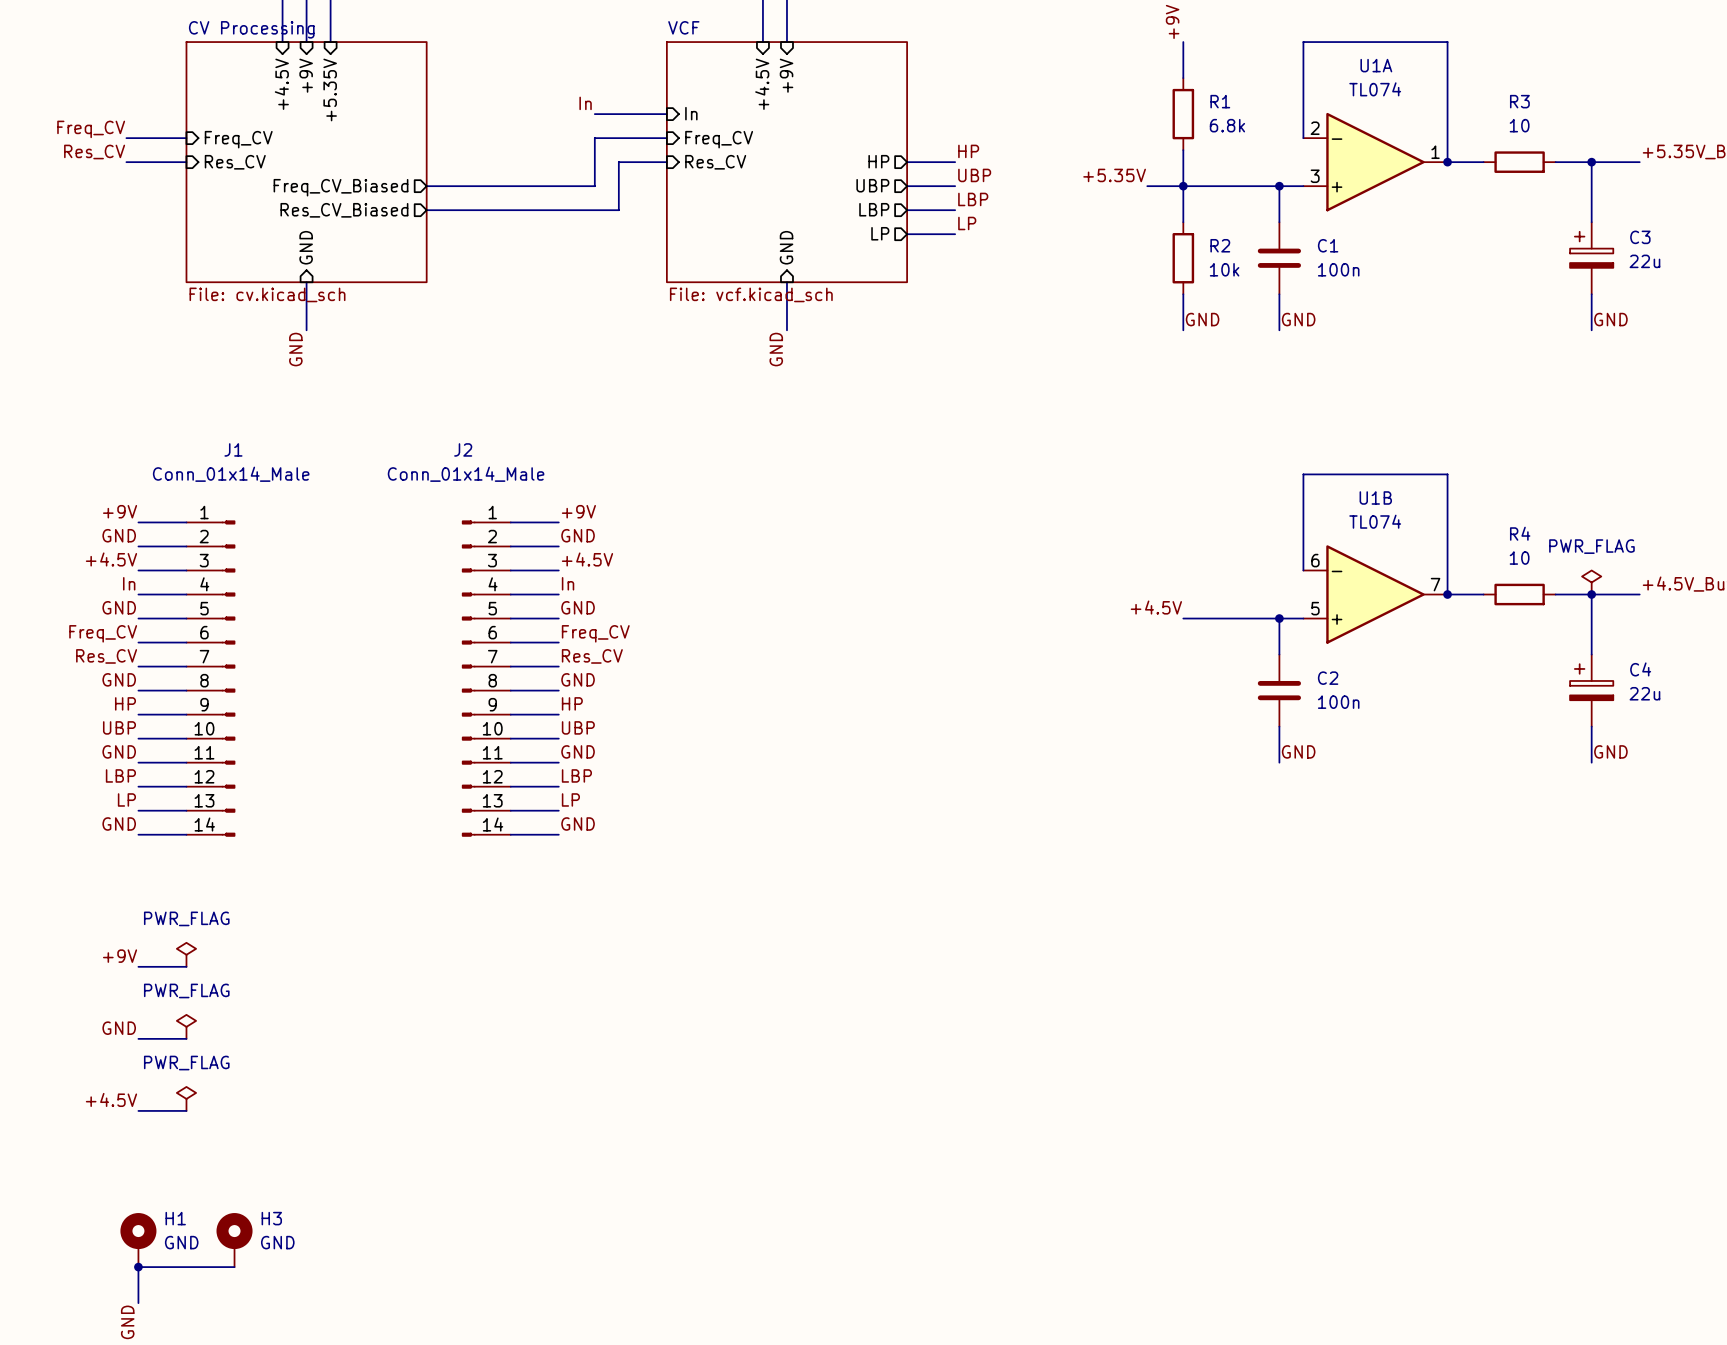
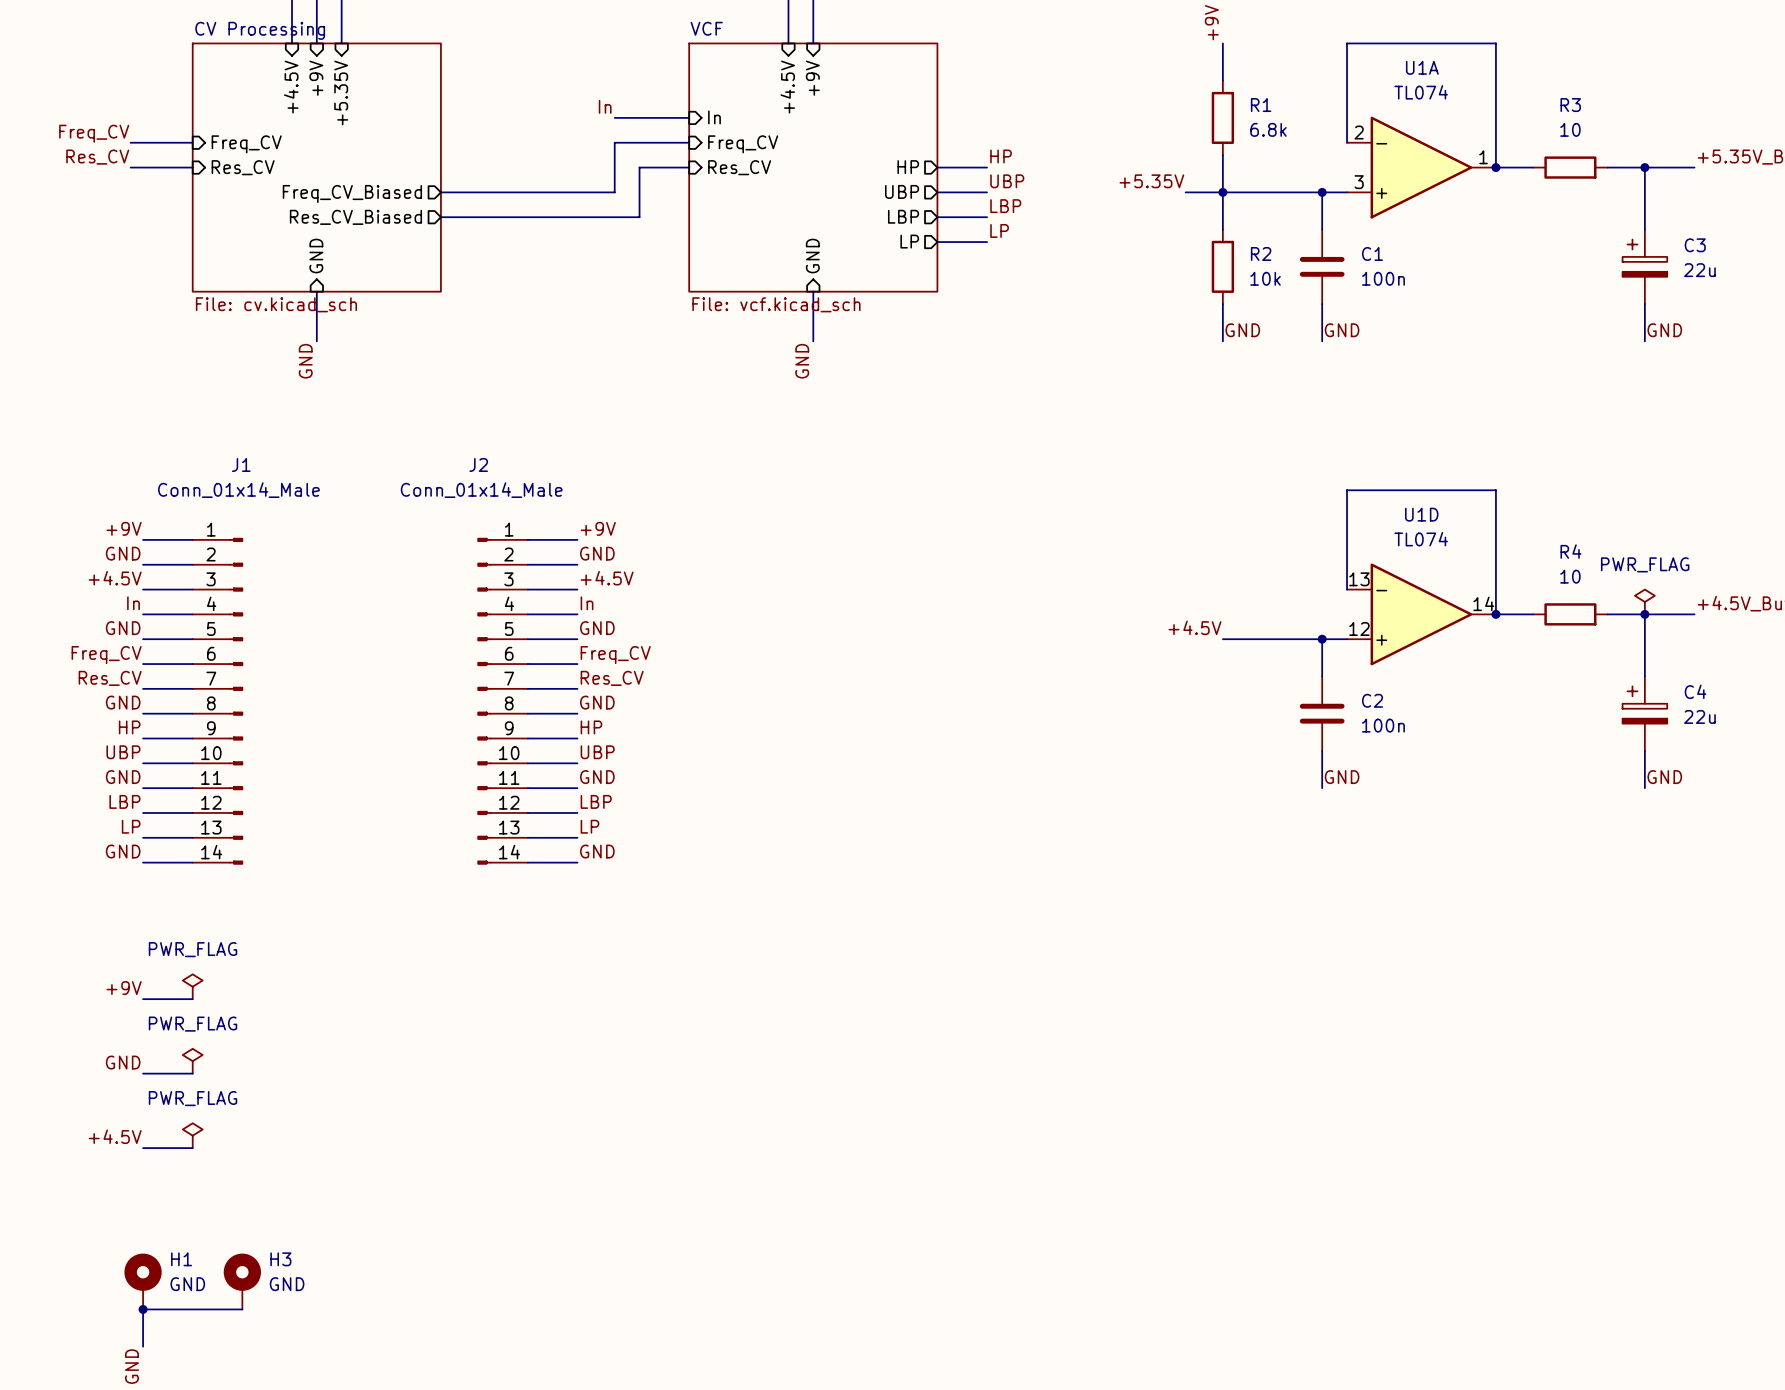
U1B name: U1B (1375, 497) -> U1D (1421, 514)
U1B pin number: 6 (1315, 560) -> 13 (1359, 579)
U1B pin number: 7 (1435, 584) -> 14 (1483, 603)
U1B pin number: 5 (1315, 608) -> 12 (1359, 628)

